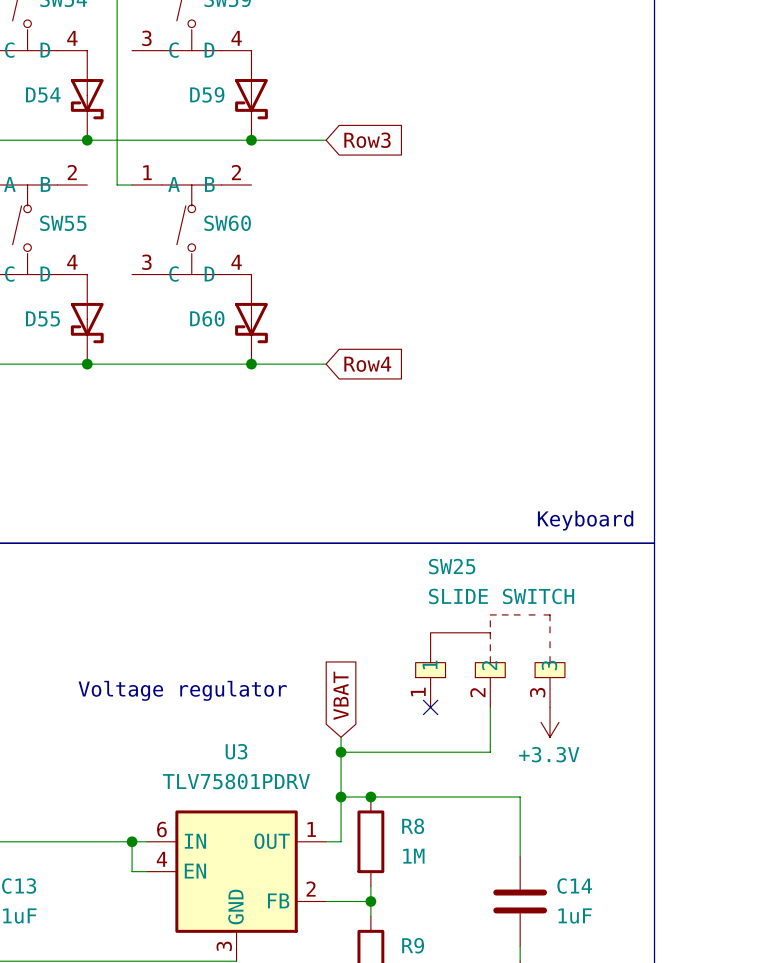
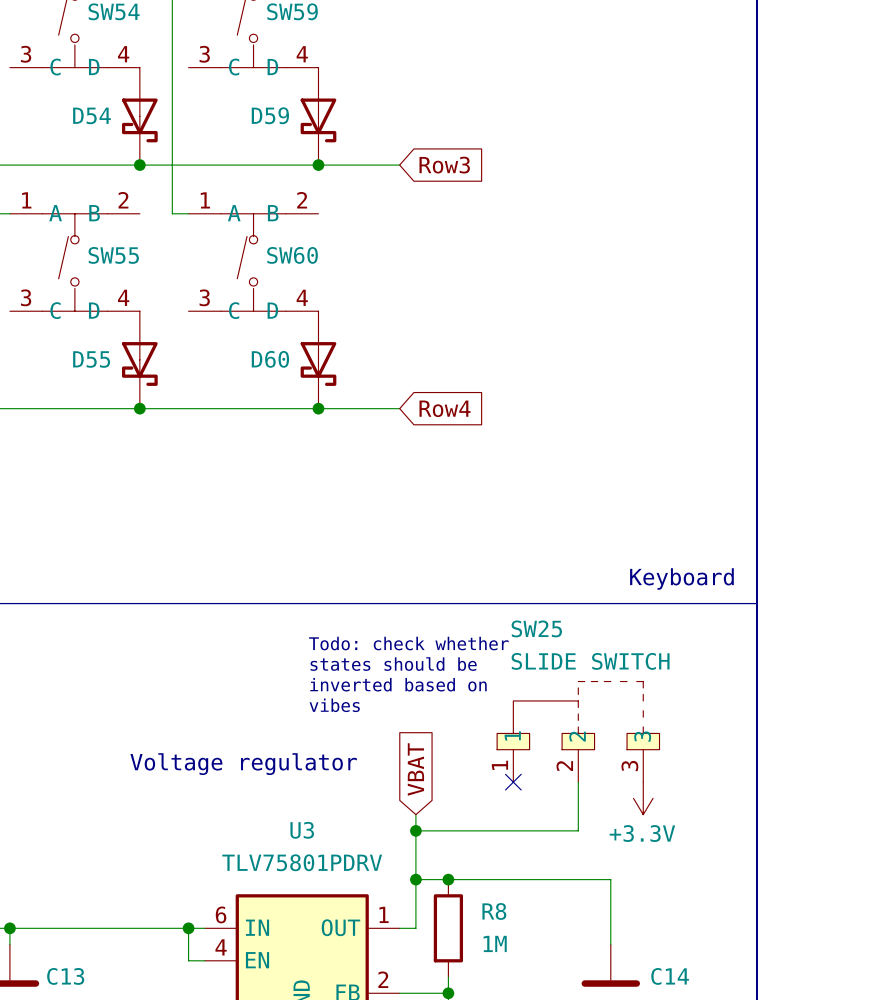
text: none -> Todo: check whether (408, 643)
text: none -> states should be (393, 664)
text: none -> inverted based on (398, 684)
text: none -> vibes (334, 705)

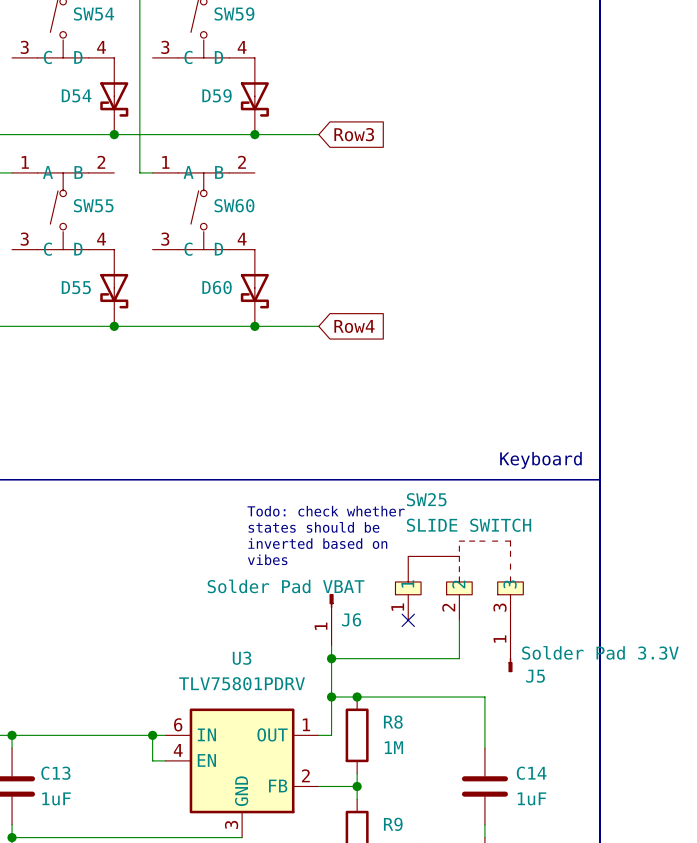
text: Voltage regulator (243, 764) -> none
global label: VBAT (415, 769) -> none
J6: none -> Solder Pad VBAT (331, 619)
power symbol: +3.3V (643, 798) -> none
J5: none -> Solder Pad 3.3V (510, 646)

